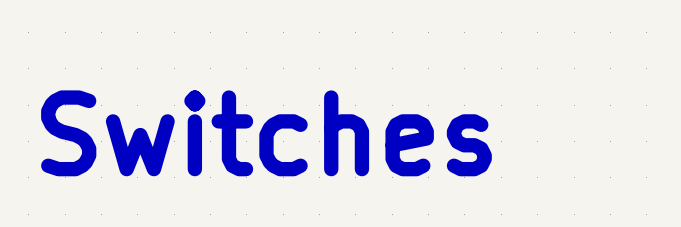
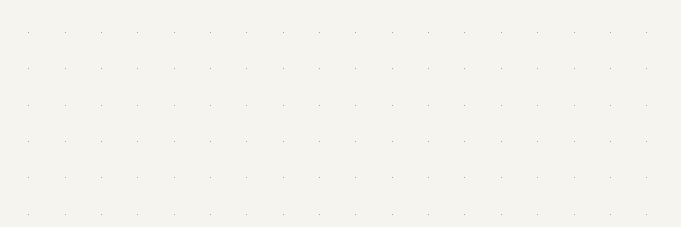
text: Switches (266, 133) -> none

